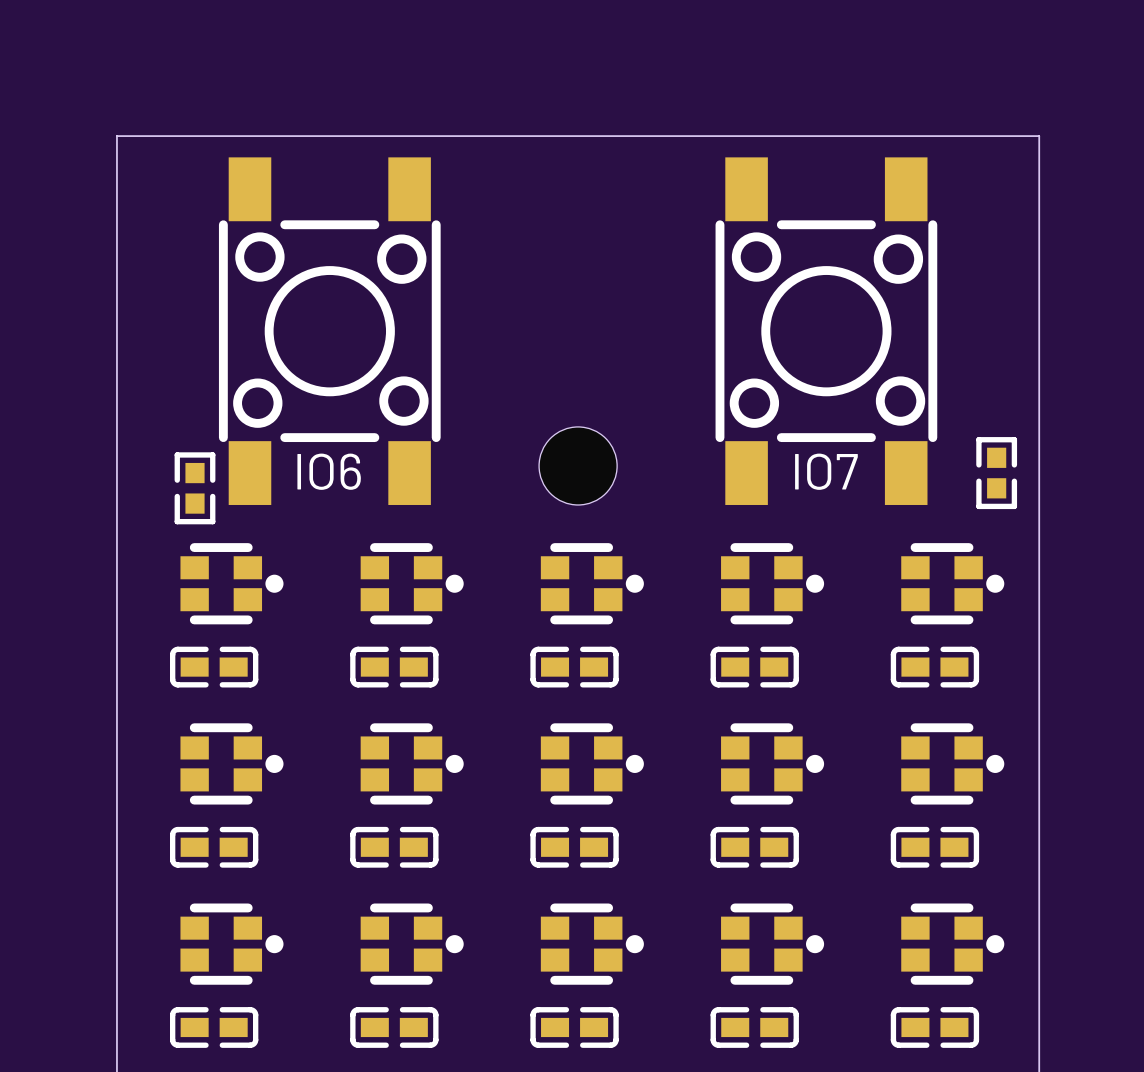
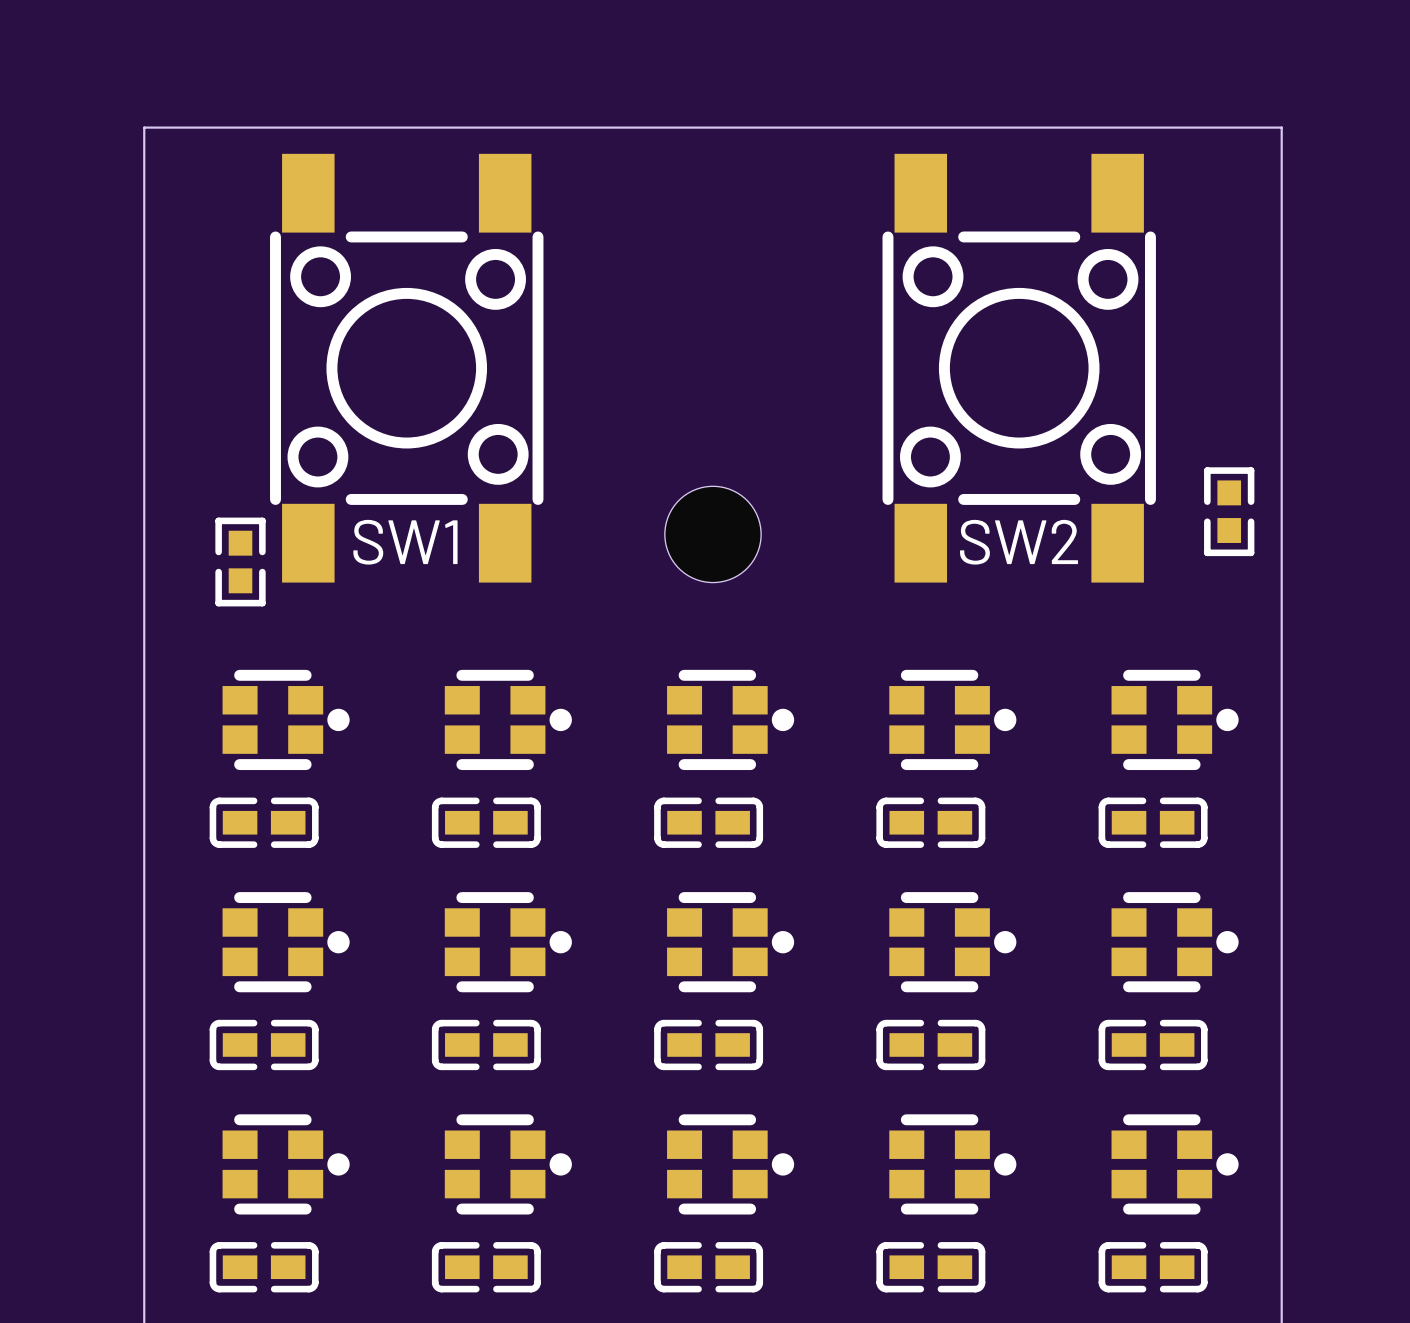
board edge: (116, 136) (1039, 136) -> (144, 167) (144, 127) (1281, 127) (1281, 167)
part position: (329, 331) -> (406, 368)
part position: (826, 331) -> (1019, 368)
text: none -> SW1 (405, 542)
text: none -> SW2 (1019, 542)
part position: (578, 465) -> (712, 534)
part text: IO6 (329, 471) -> none
part text: IO7 (826, 471) -> none
part position: (996, 473) -> (1229, 511)
part position: (195, 488) -> (240, 562)

